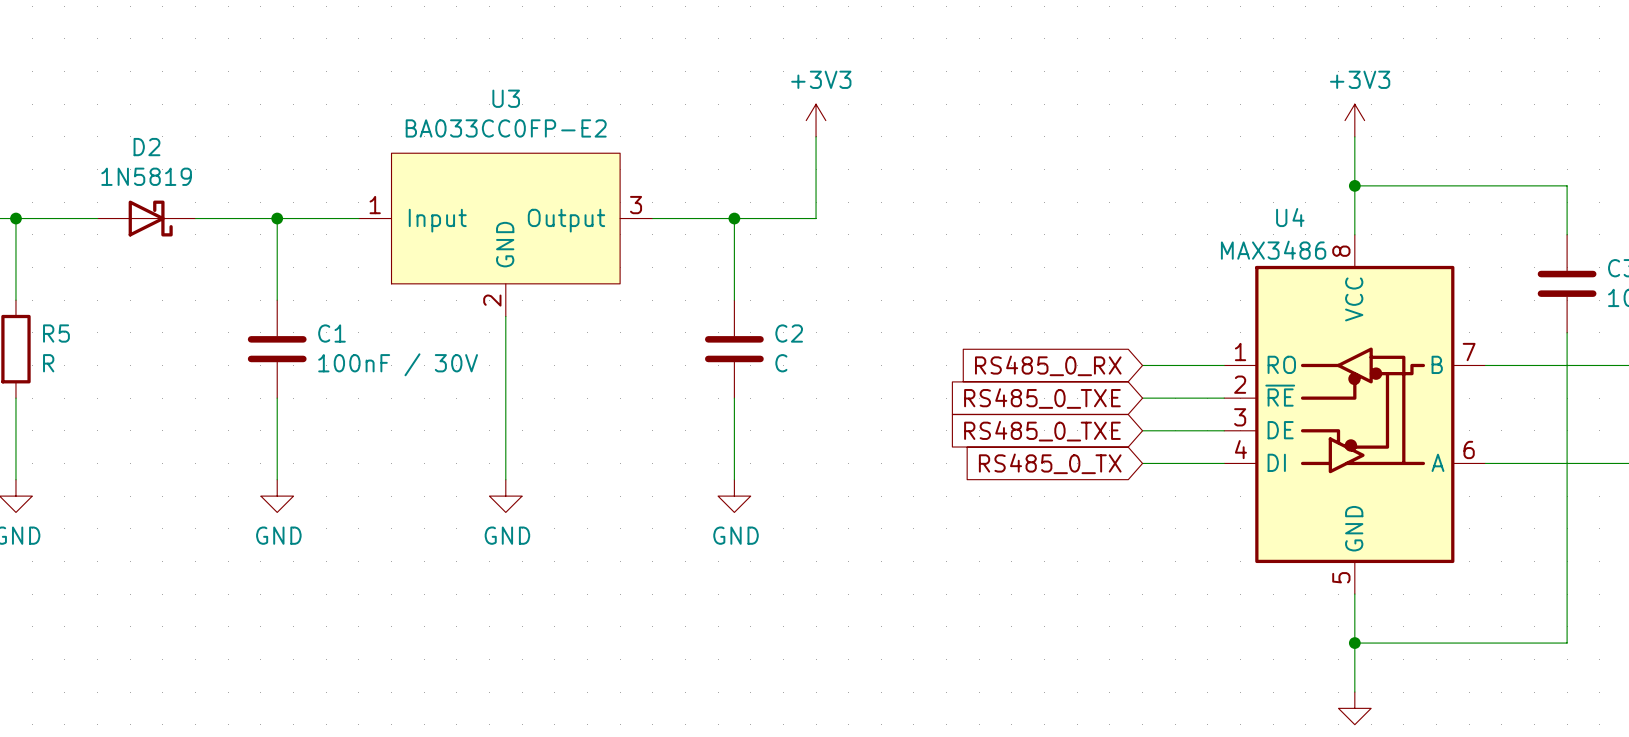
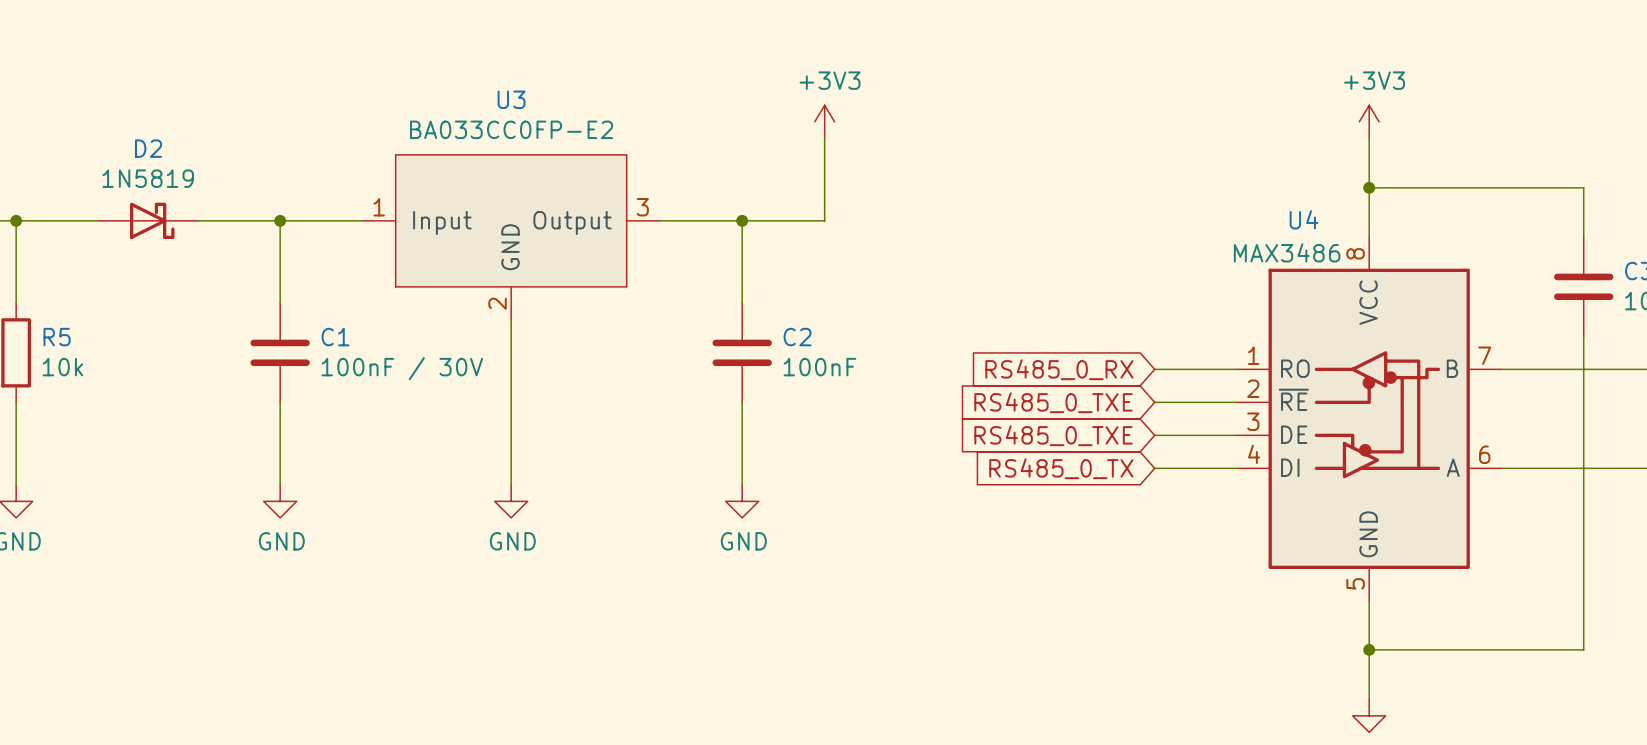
R5 value: R (48, 363) -> 10k (62, 367)
C2 value: C (781, 363) -> 100nF (819, 367)

